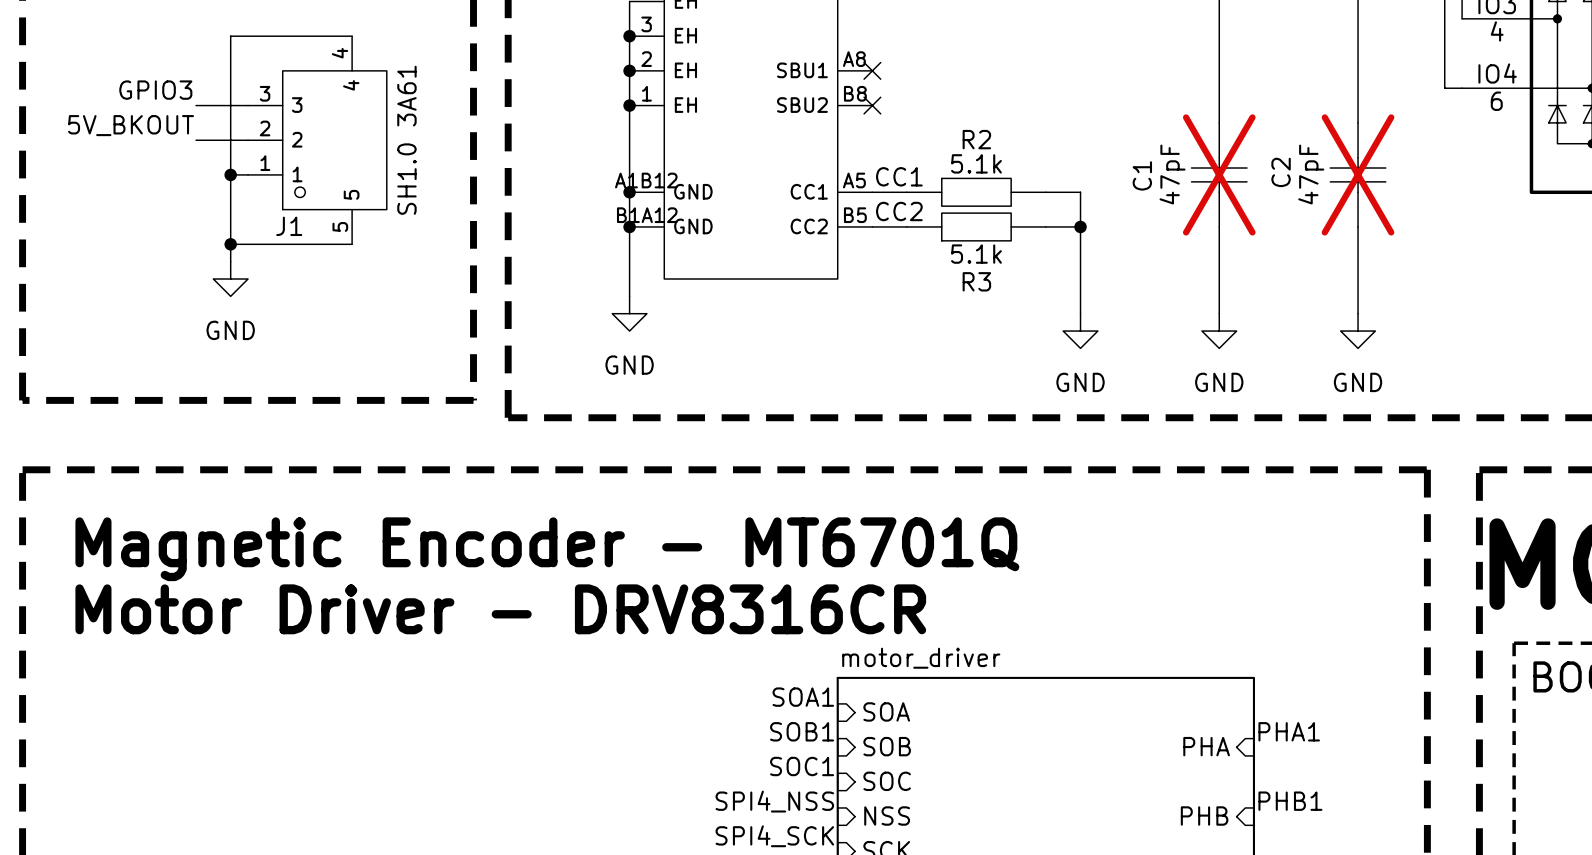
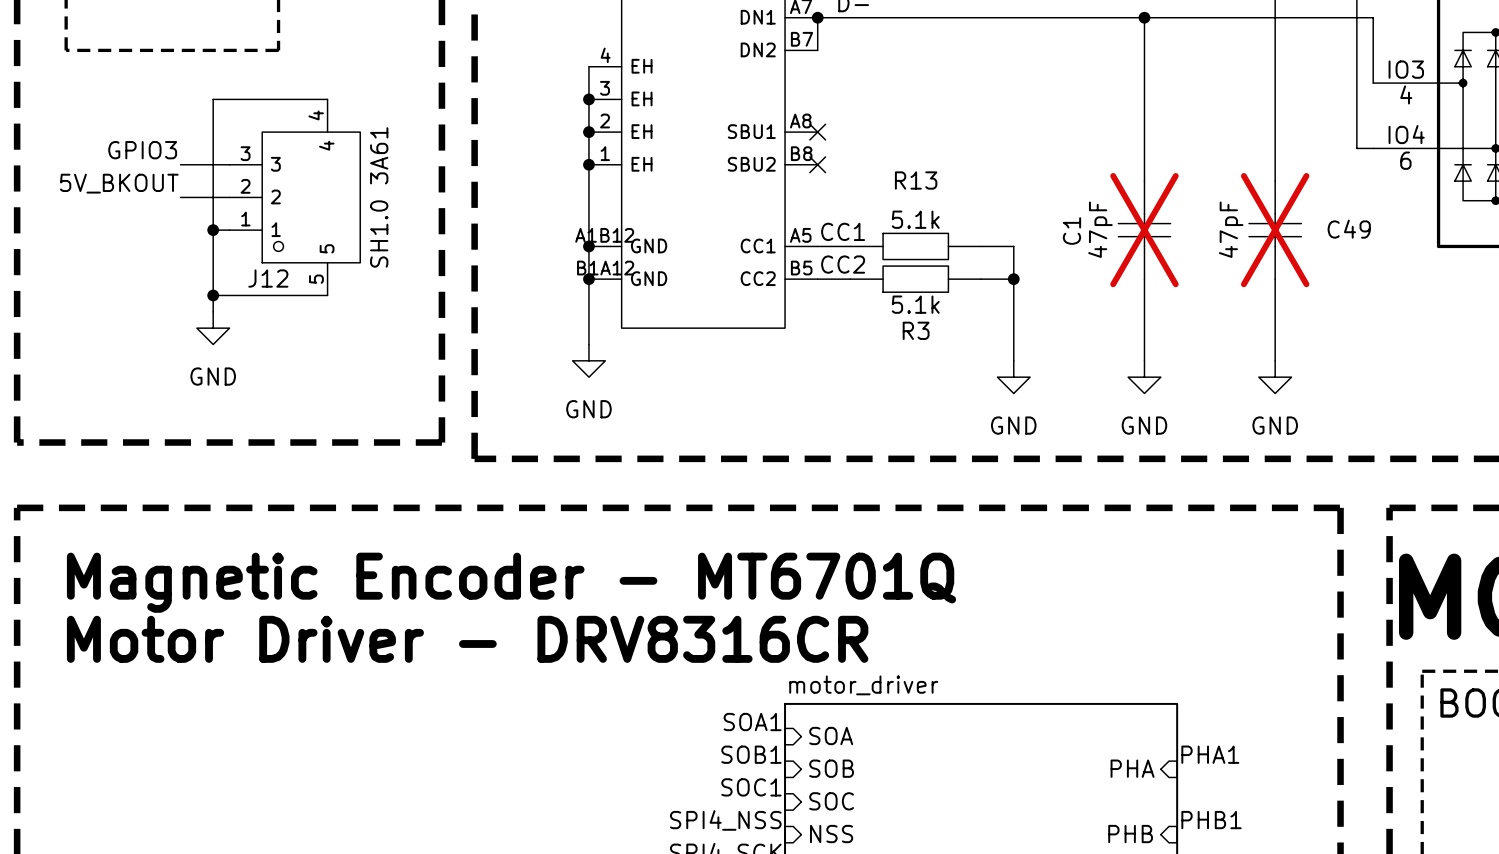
R2 name: R2 (976, 139) -> R13 (916, 180)
C2 name: C2 (1281, 172) -> C49 (1349, 229)
J1 name: J1 (289, 226) -> J12 (268, 278)

